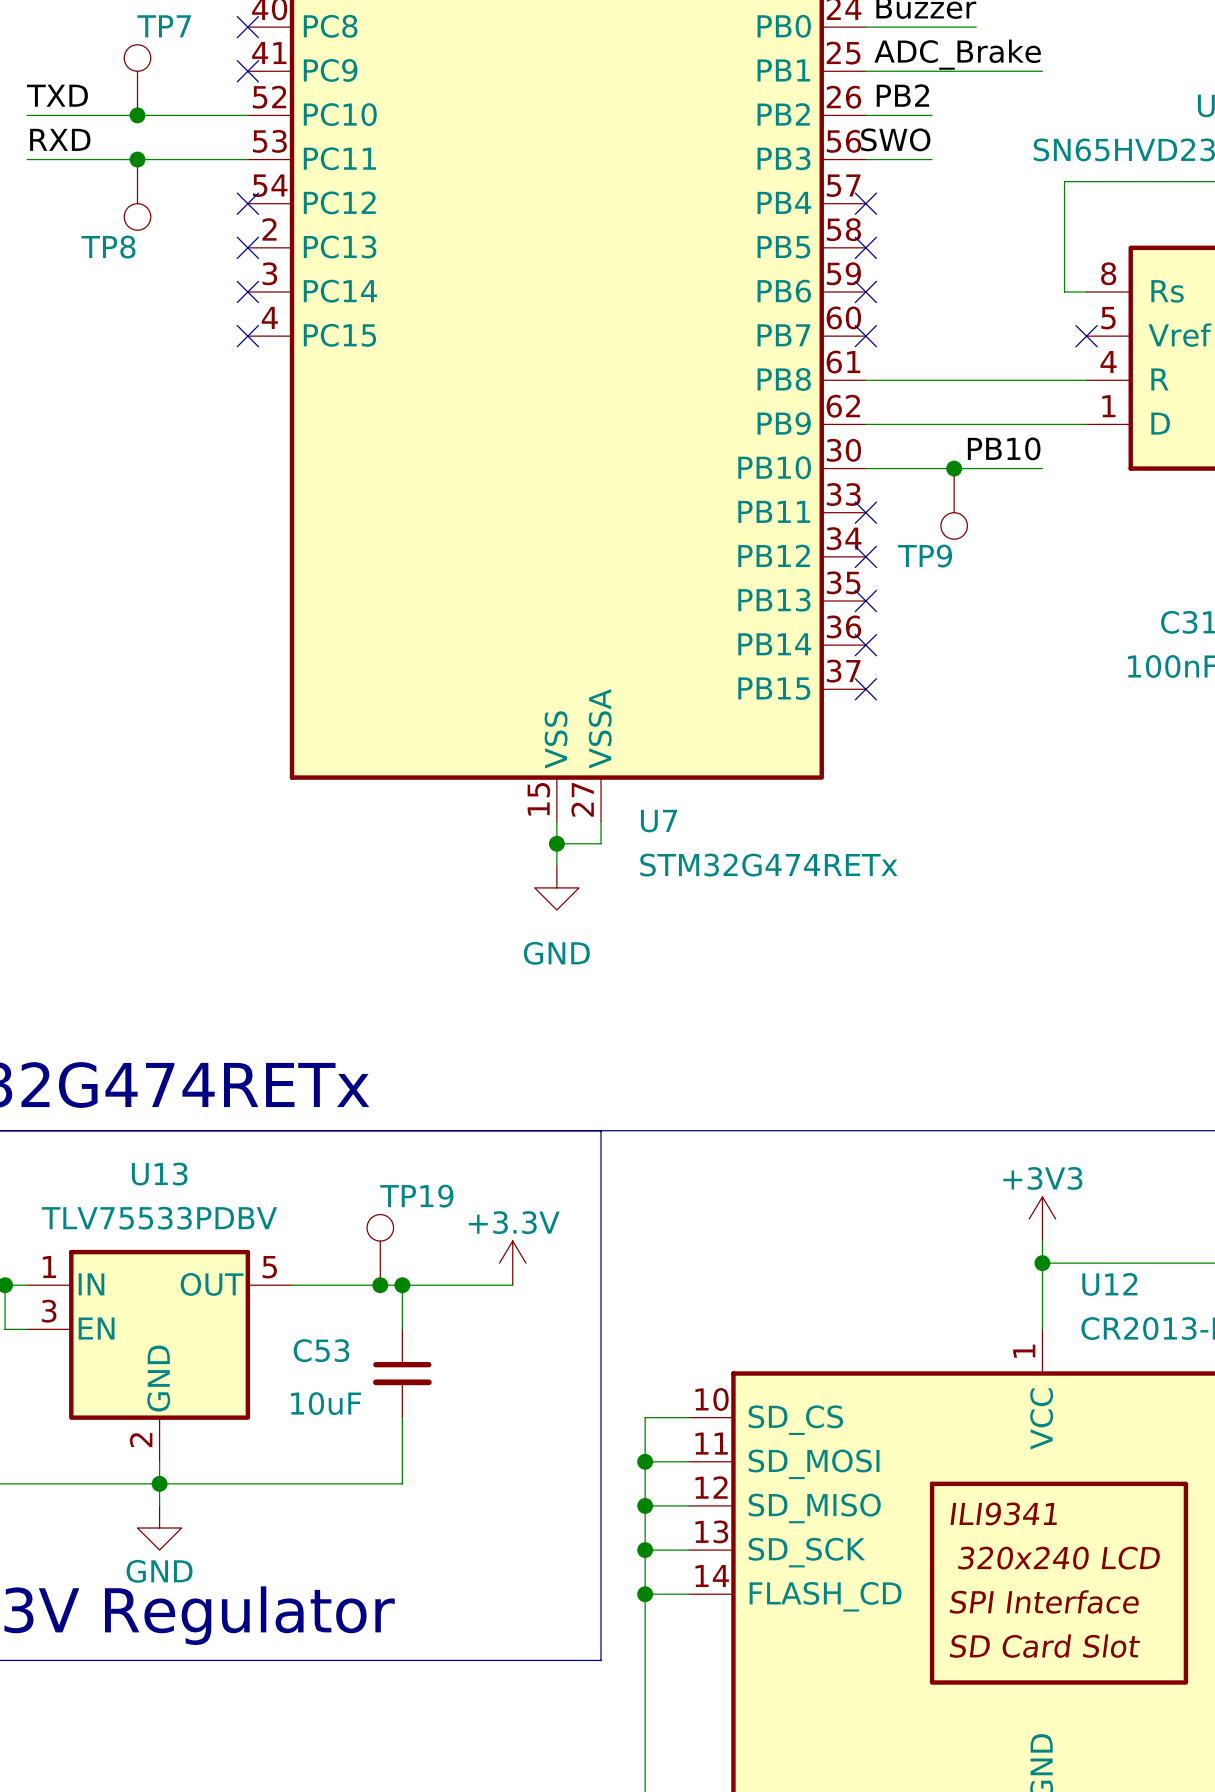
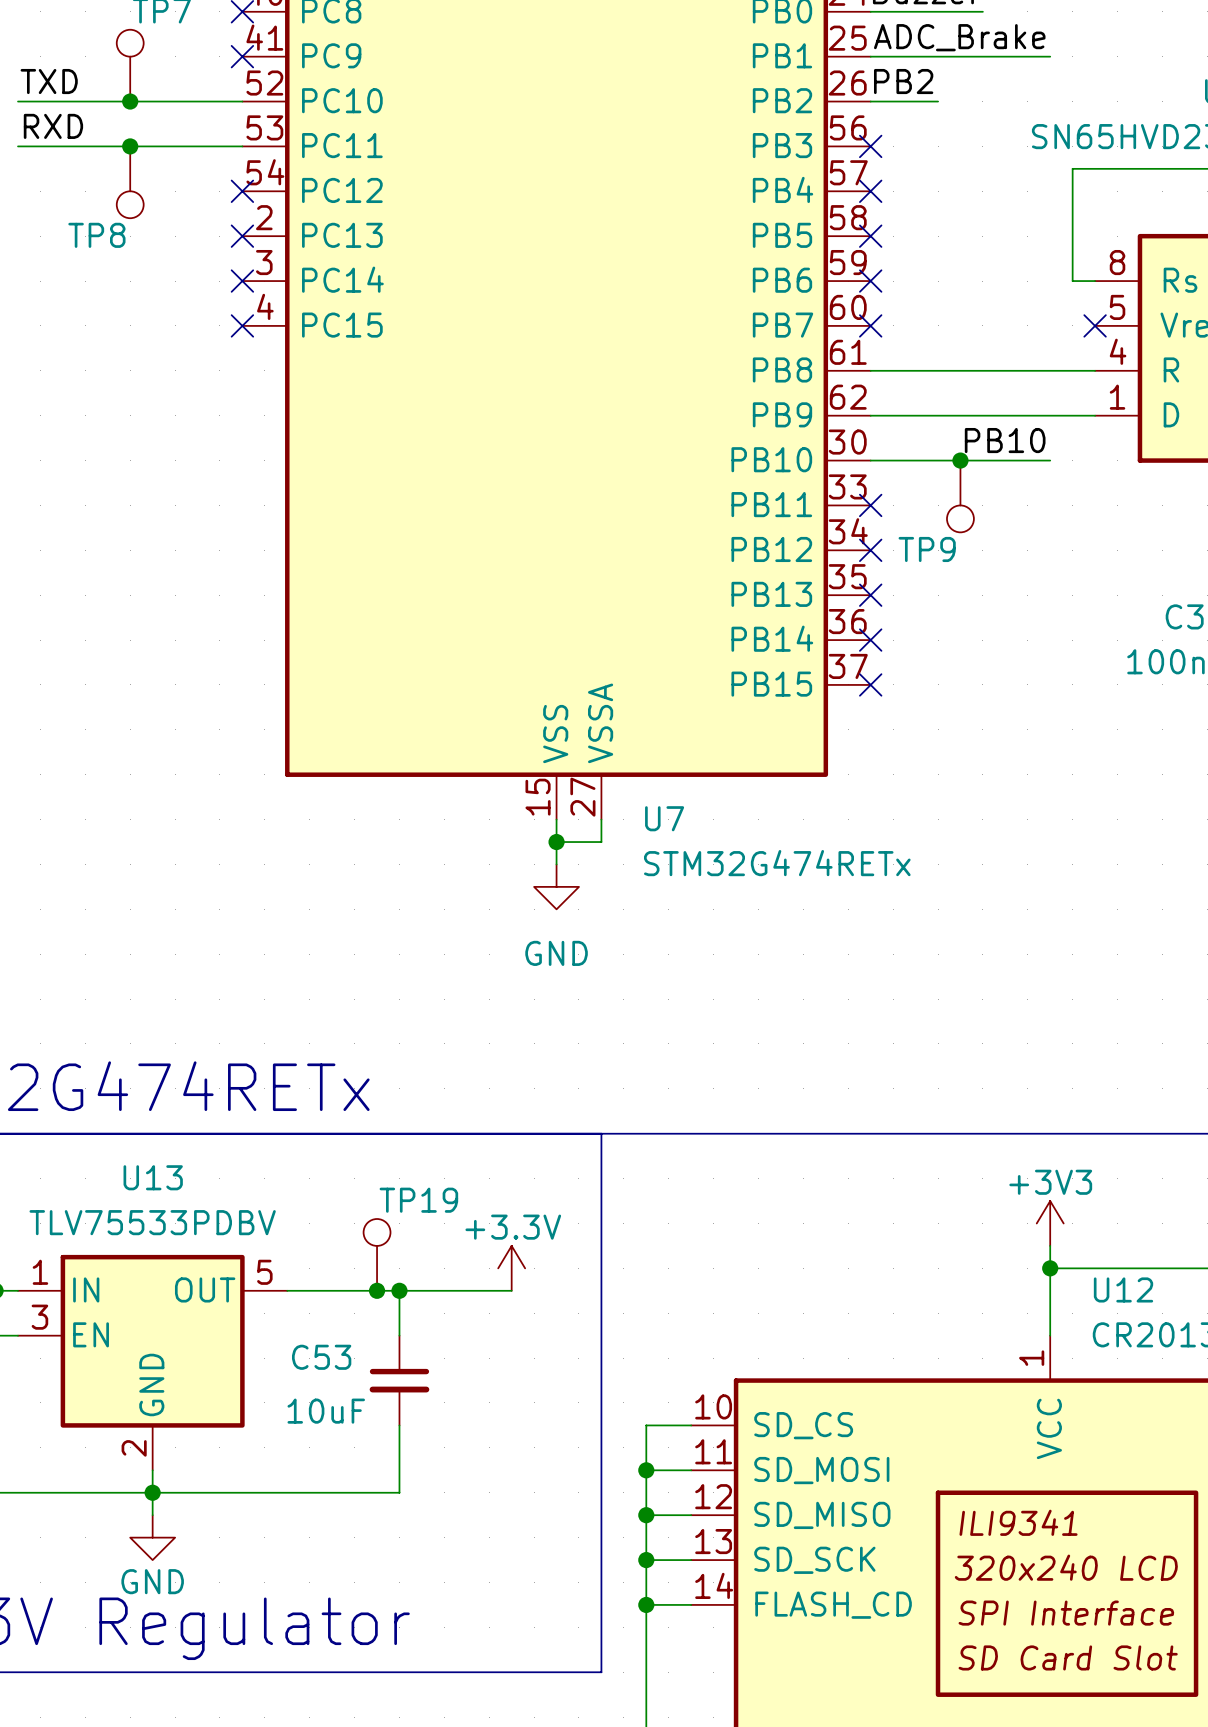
label: SWO (895, 139) -> none
wire: (865, 159) (932, 159) -> none
no-connect mark: none -> (870, 146)

